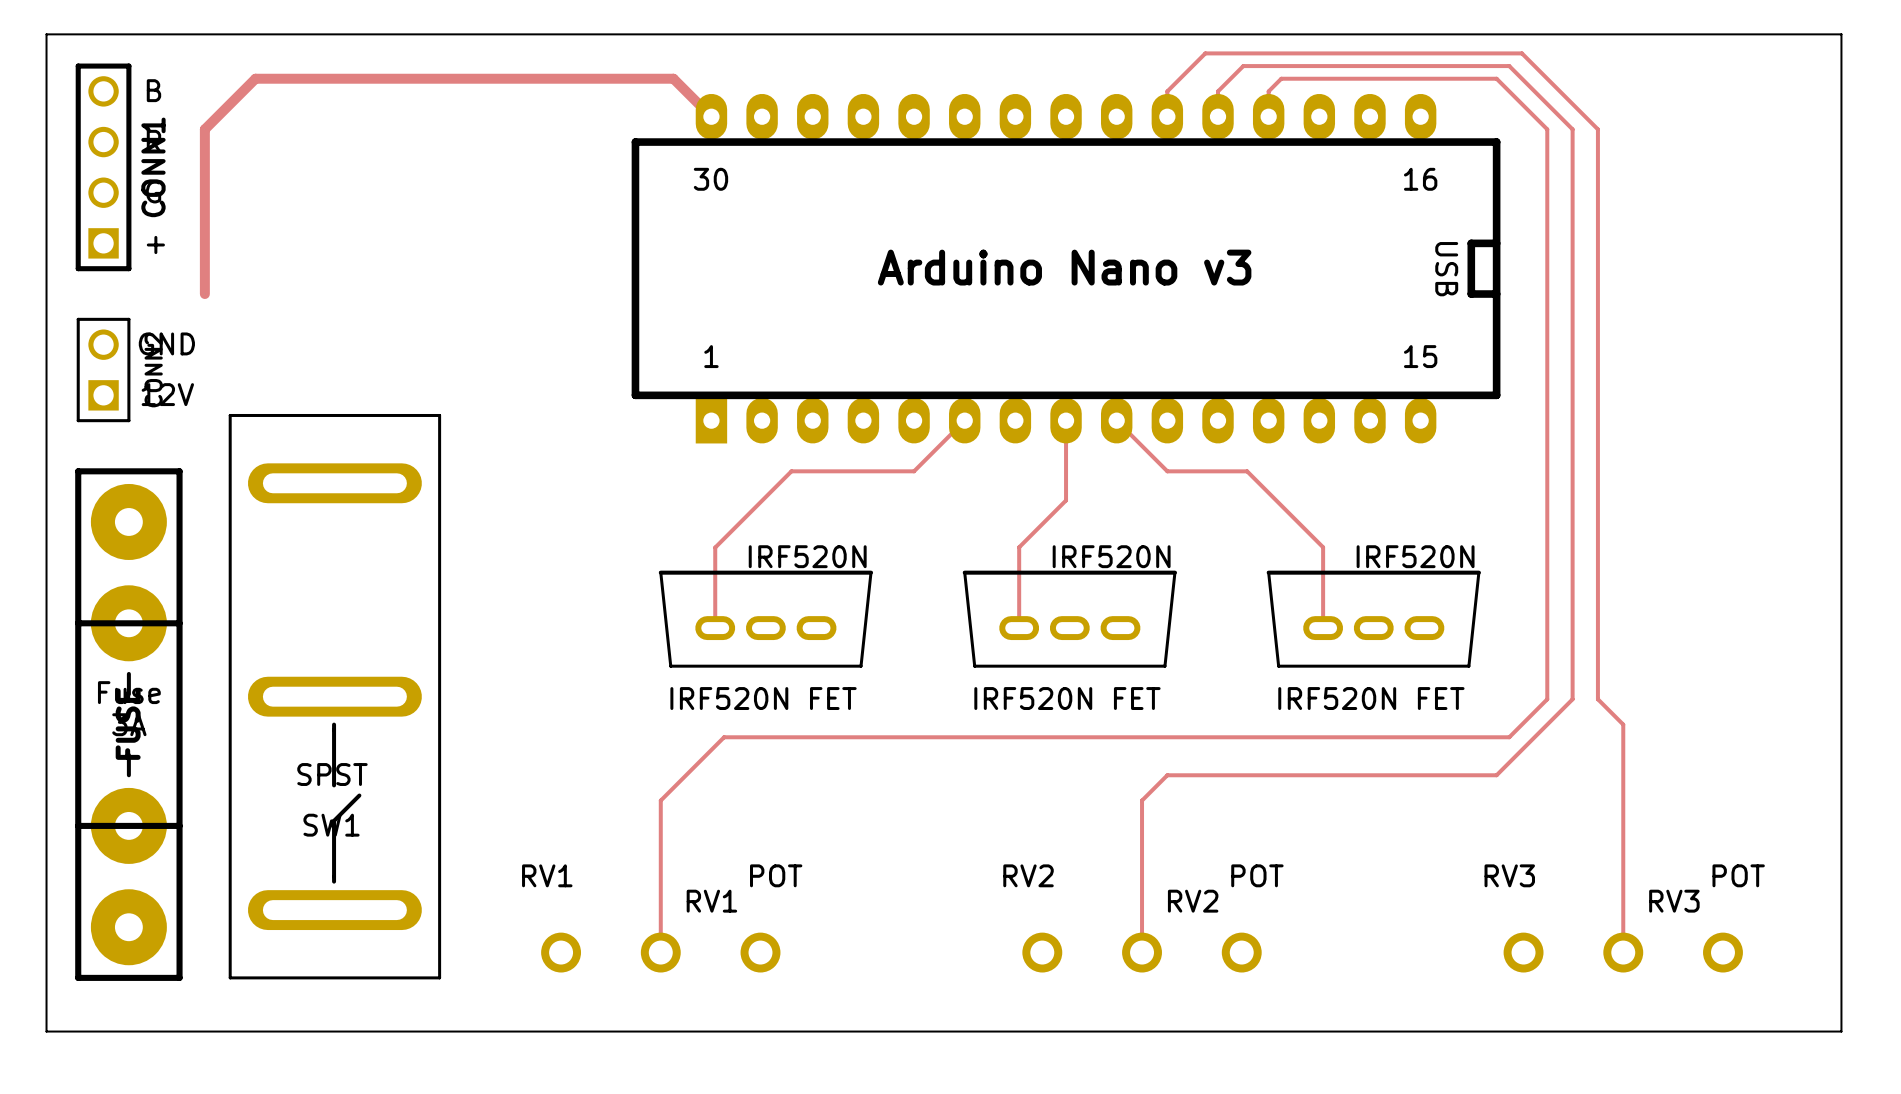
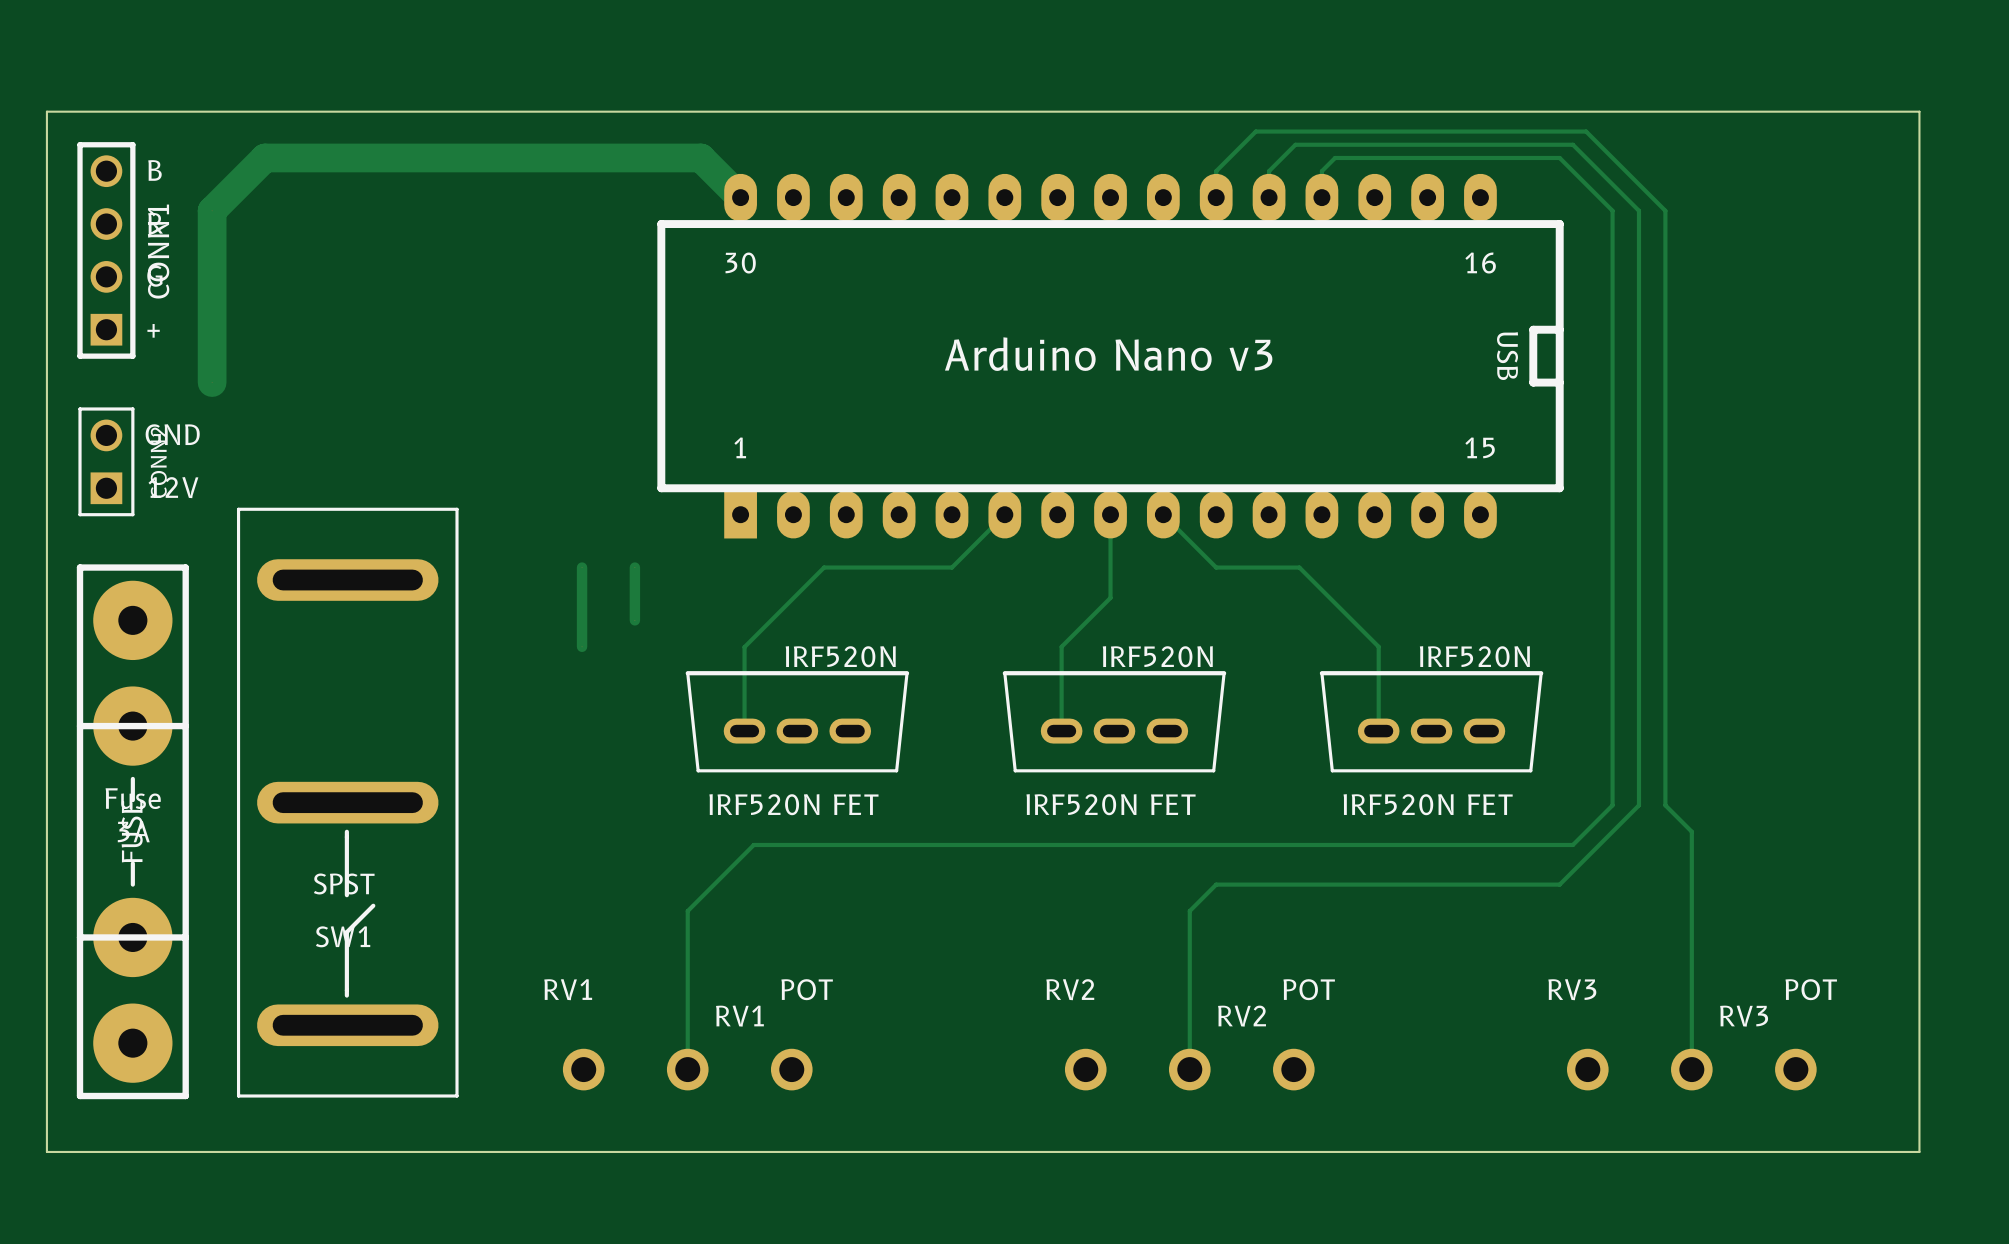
track width: thin (711, 116) (673, 78) (255, 78) (204, 129) (204, 294) -> thick (740, 197) (700, 157) (264, 157) (212, 210) (212, 382)
track: none -> (582, 567) (582, 646)
track: none -> (634, 567) (634, 620)

